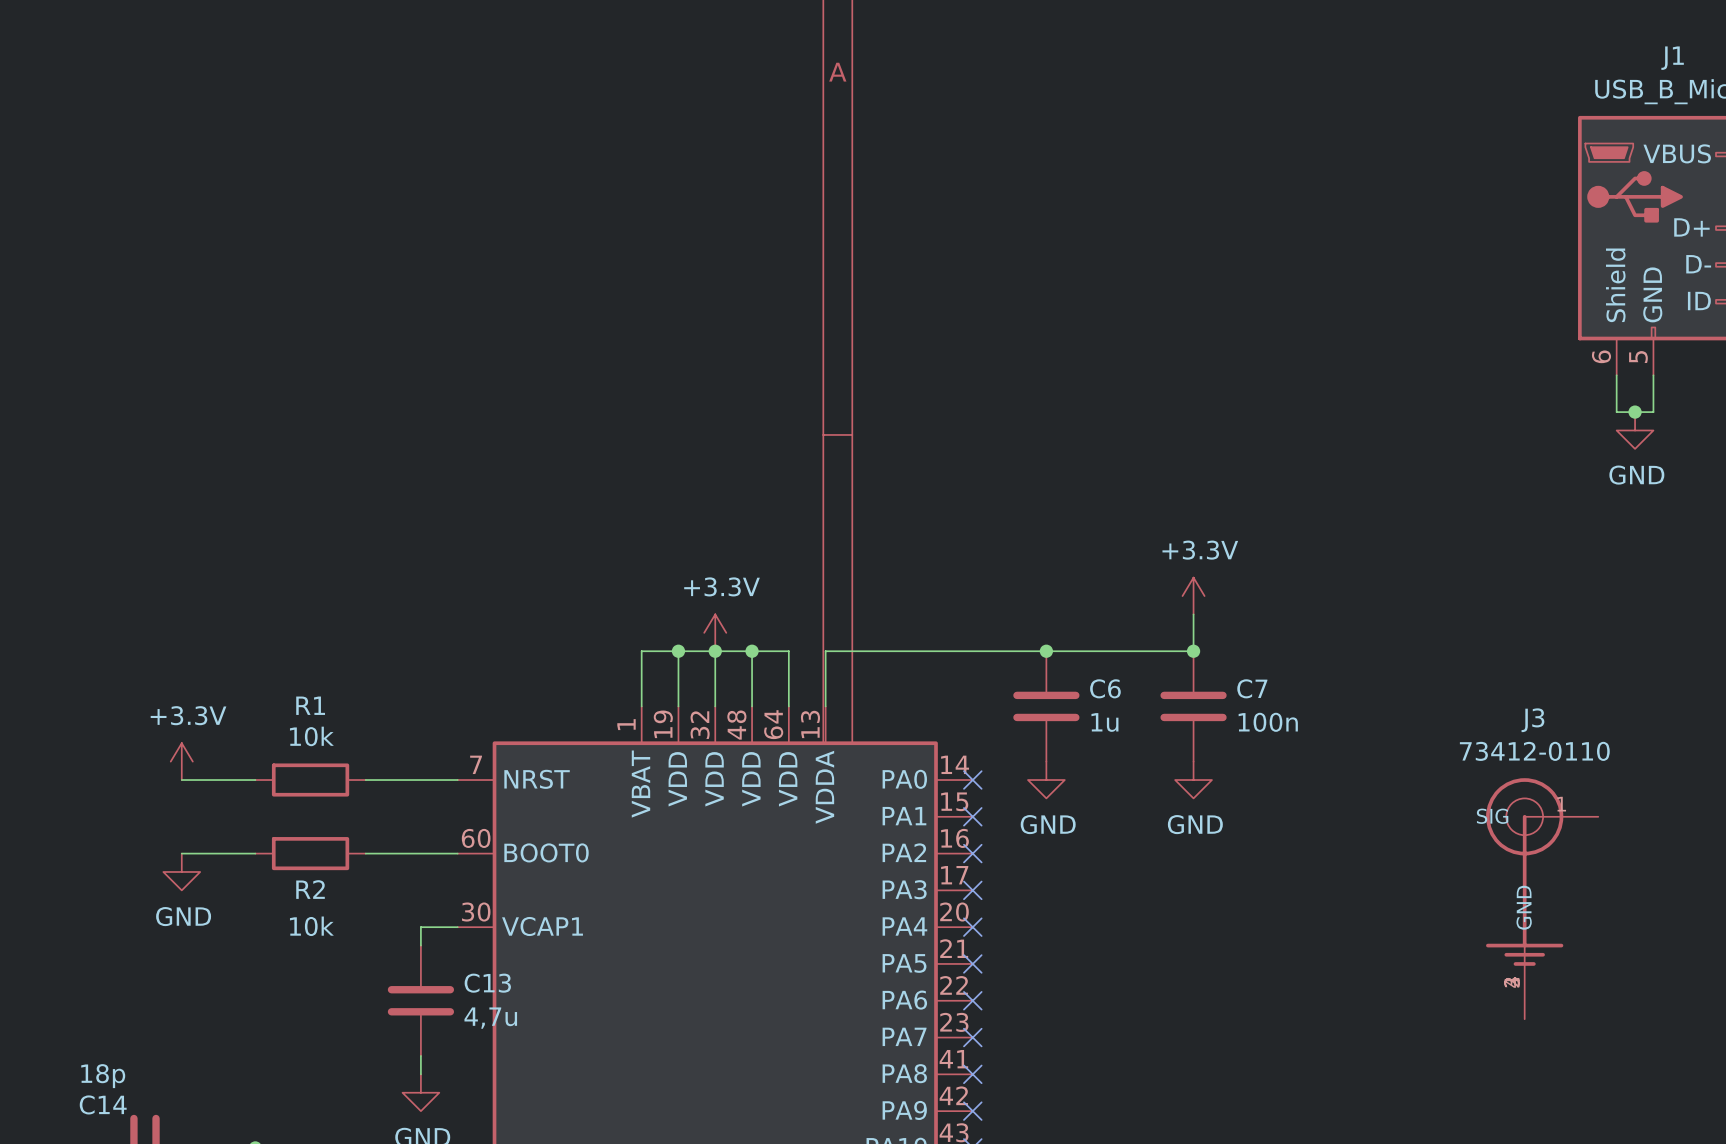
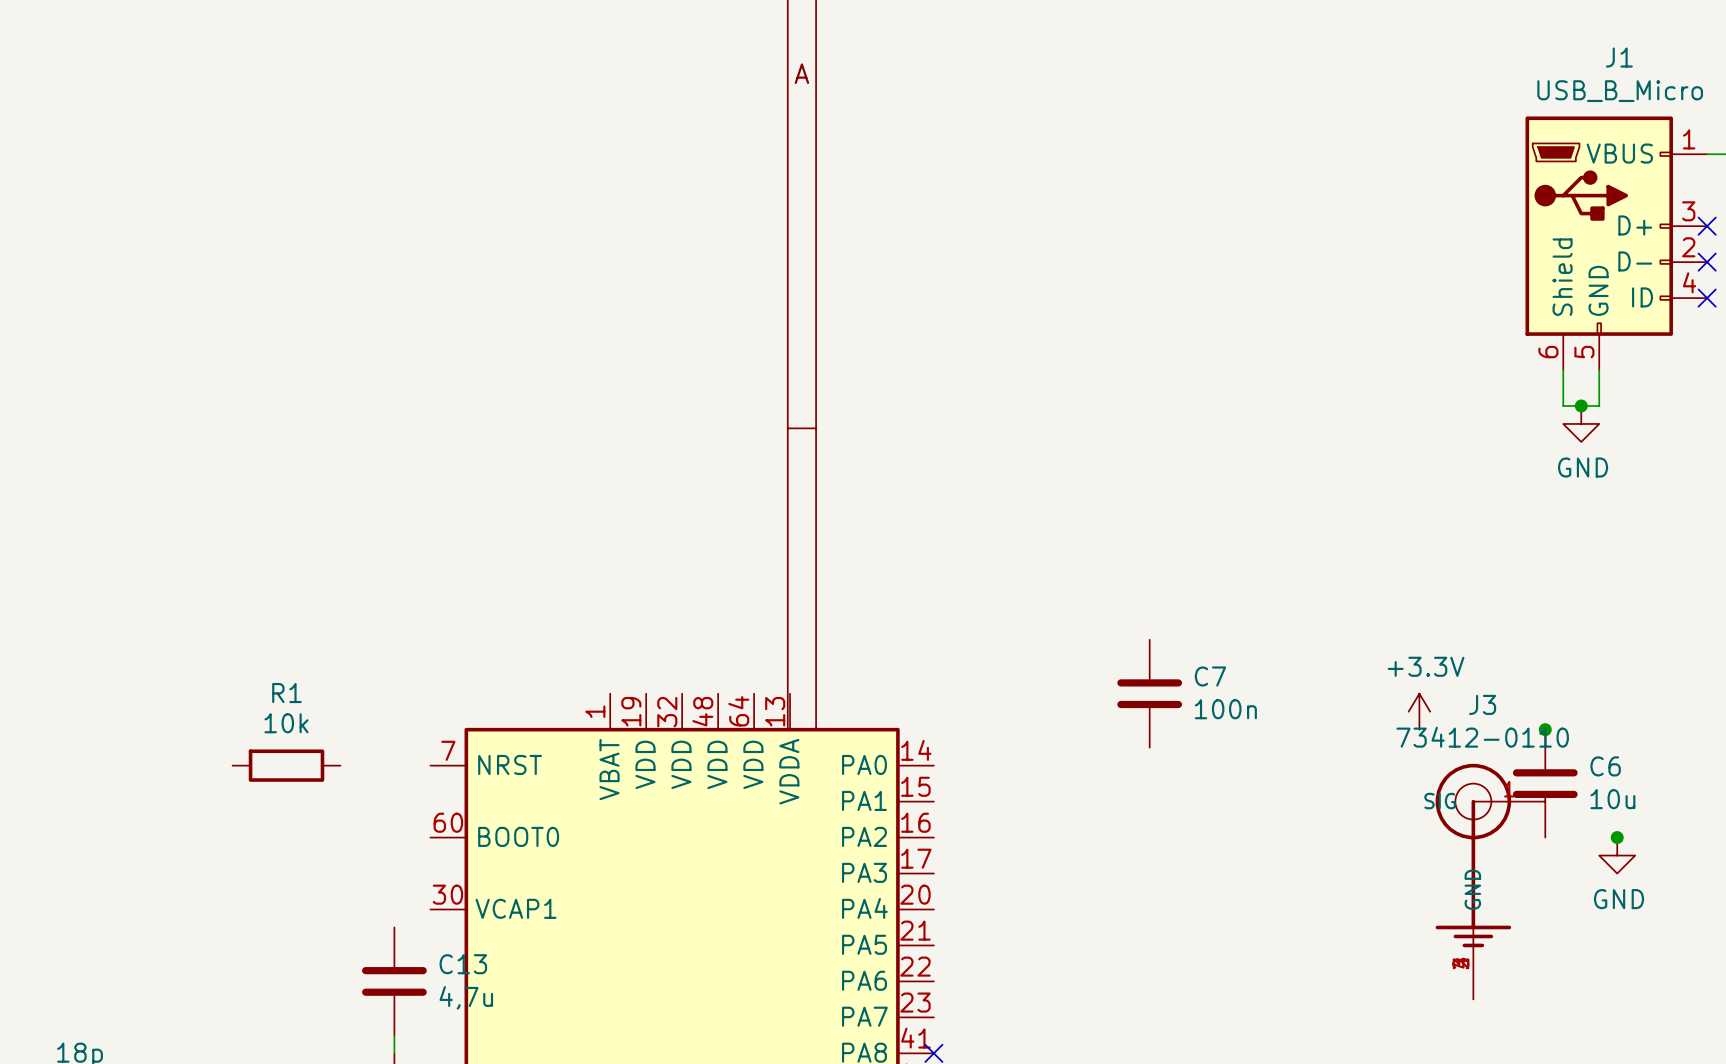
power symbol position: +3.3V (1193, 596) -> +3.3V (1419, 711)
wire: (1193, 614) (1193, 651) (825, 651) (825, 706) -> none
power symbol: +3.3V (715, 632) -> none
wire: (678, 651) (678, 706) -> none
junction: (678, 651) -> none
wire: (715, 651) (715, 706) -> none
junction: (715, 651) -> none
wire: (752, 651) (752, 706) -> none
junction: (752, 651) -> none
junction: (1046, 651) -> none
junction: (1193, 651) -> none
wire: (641, 706) (641, 651) (788, 651) (788, 706) -> none
C6 position: (1046, 706) -> (1545, 783)
C6 value: 1u (1104, 722) -> 10u (1612, 799)
junction: none -> (1545, 729)
power symbol: +3.3V (181, 761) -> none
wire: (181, 780) (255, 780) -> none
wire: (365, 780) (457, 780) -> none
no-connect mark: (972, 780) -> none
power symbol: GND (1046, 780) -> none
power symbol: GND (1193, 780) -> none
no-connect mark: (972, 816) -> none
wire: (181, 853) (255, 853) -> none
R2: 10k (310, 853) -> none
wire: (365, 853) (457, 853) -> none
no-connect mark: (972, 853) -> none
junction: none -> (1617, 837)
power symbol: GND (181, 871) -> none
power symbol: none -> GND (1617, 855)
no-connect mark: (972, 890) -> none
wire: (457, 927) (420, 927) (420, 945) -> none
no-connect mark: (972, 927) -> none
no-connect mark: (972, 963) -> none
no-connect mark: (972, 1000) -> none
no-connect mark: (972, 1037) -> none

